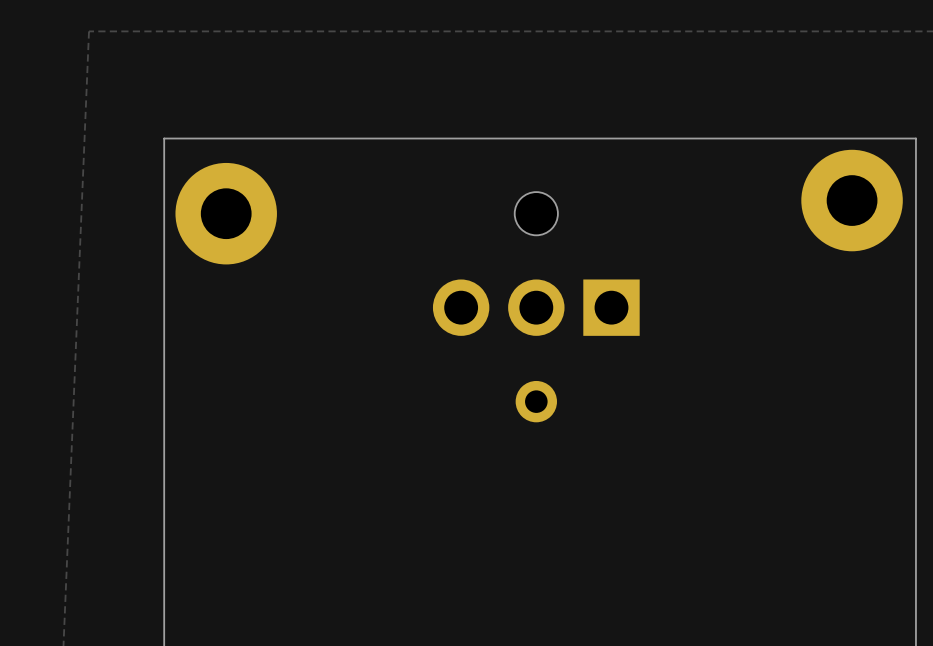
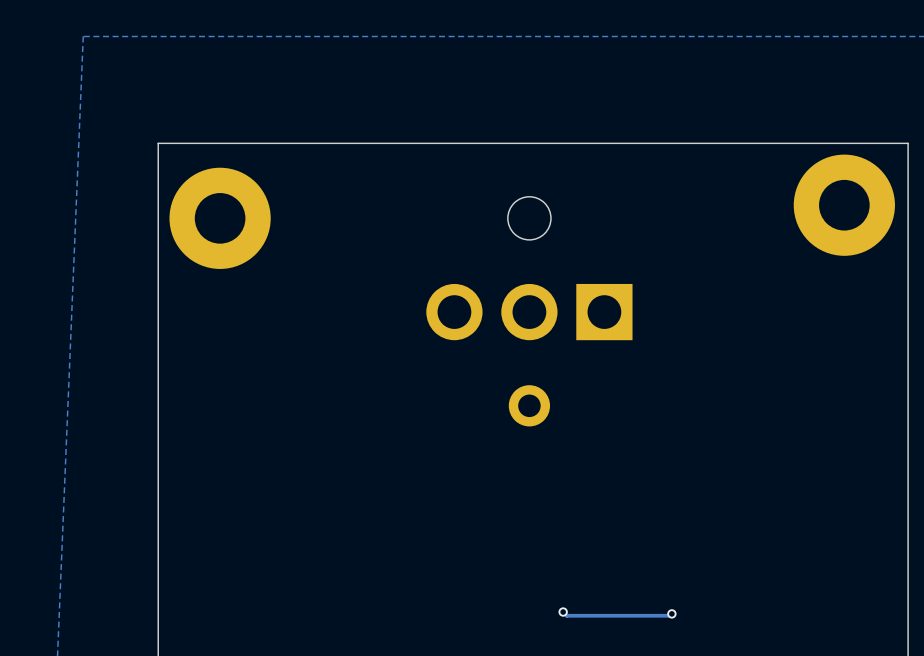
track: none -> (563, 612) (566, 615) (670, 615) (671, 613)
via: none -> (563, 612)
via: none -> (671, 613)

